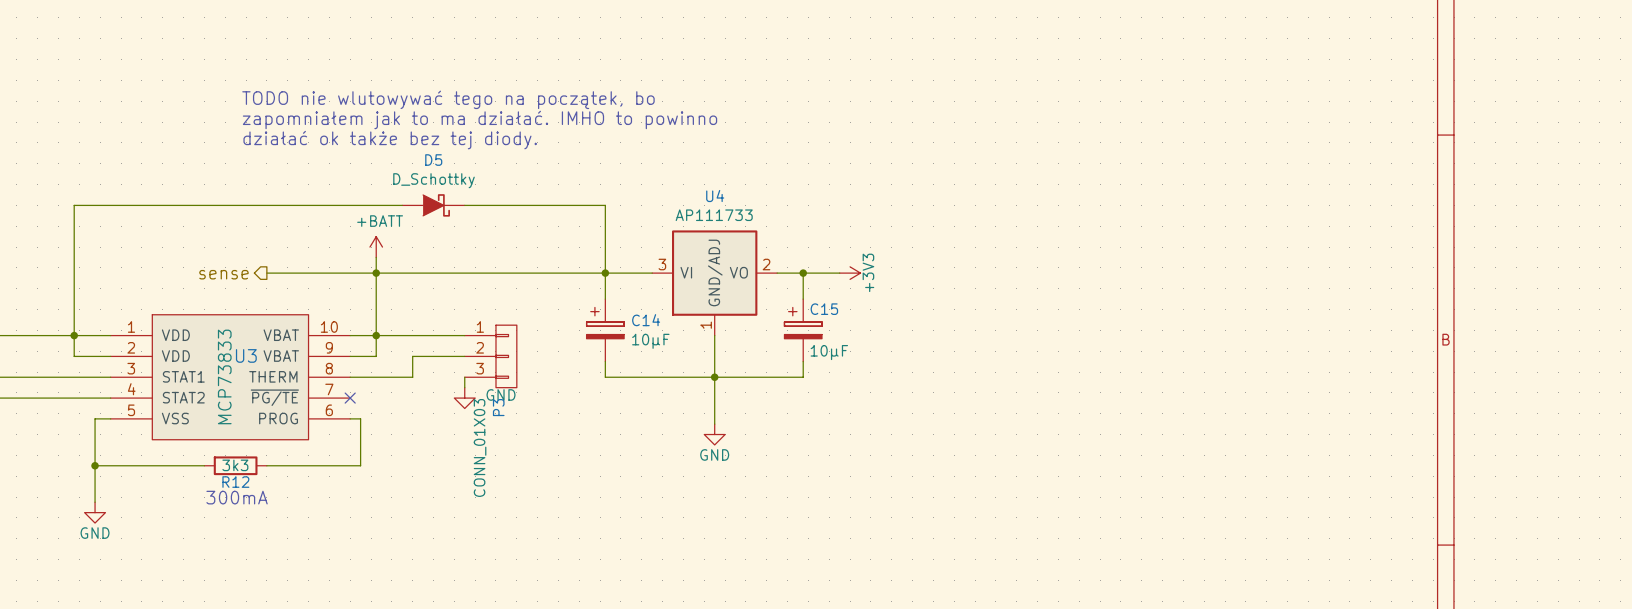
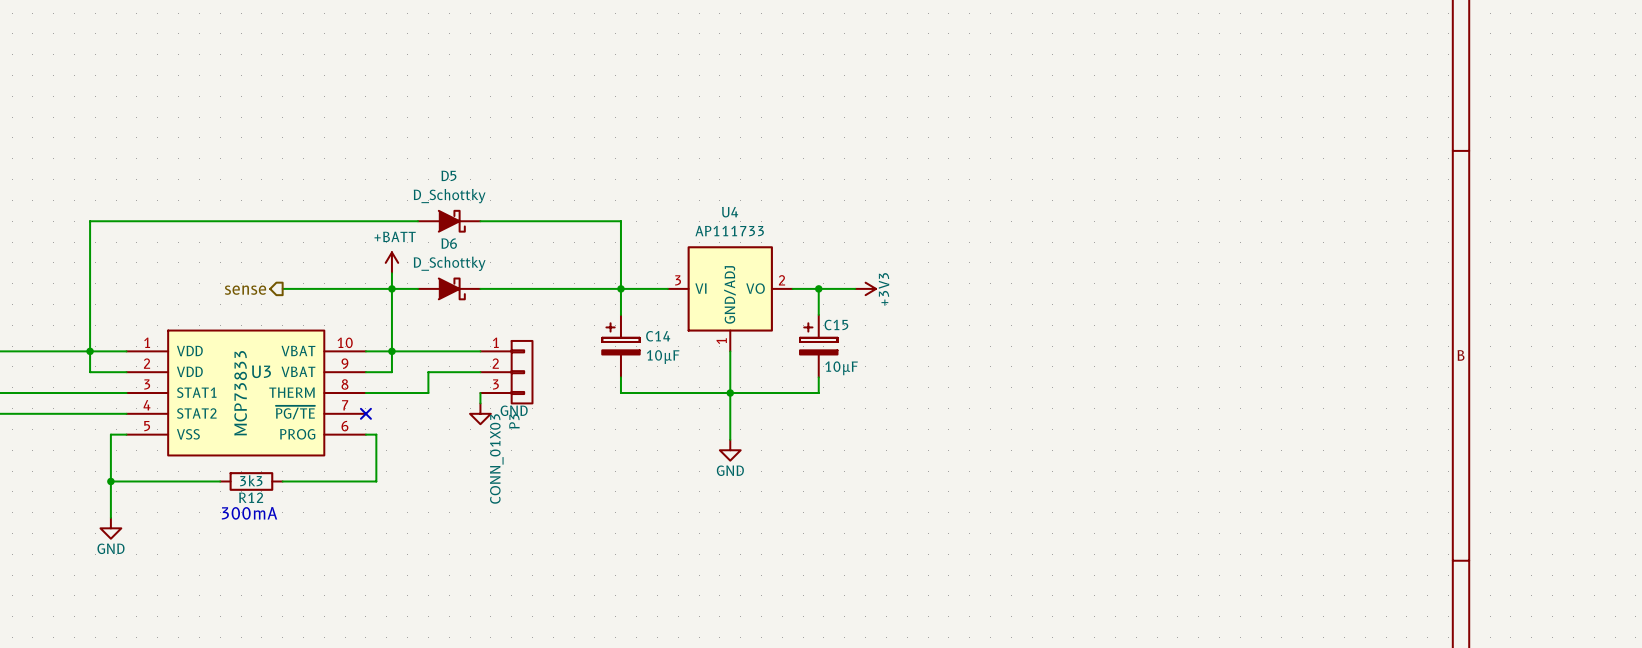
text: TODO nie wlutowywać tego na początek, bo (448, 99) -> none
text: zapomniałem jak to ma działać. IMHO to powinno (480, 119) -> none
text: działać ok także bez tej diody. (390, 140) -> none
D6: none -> D_Schottky (449, 288)

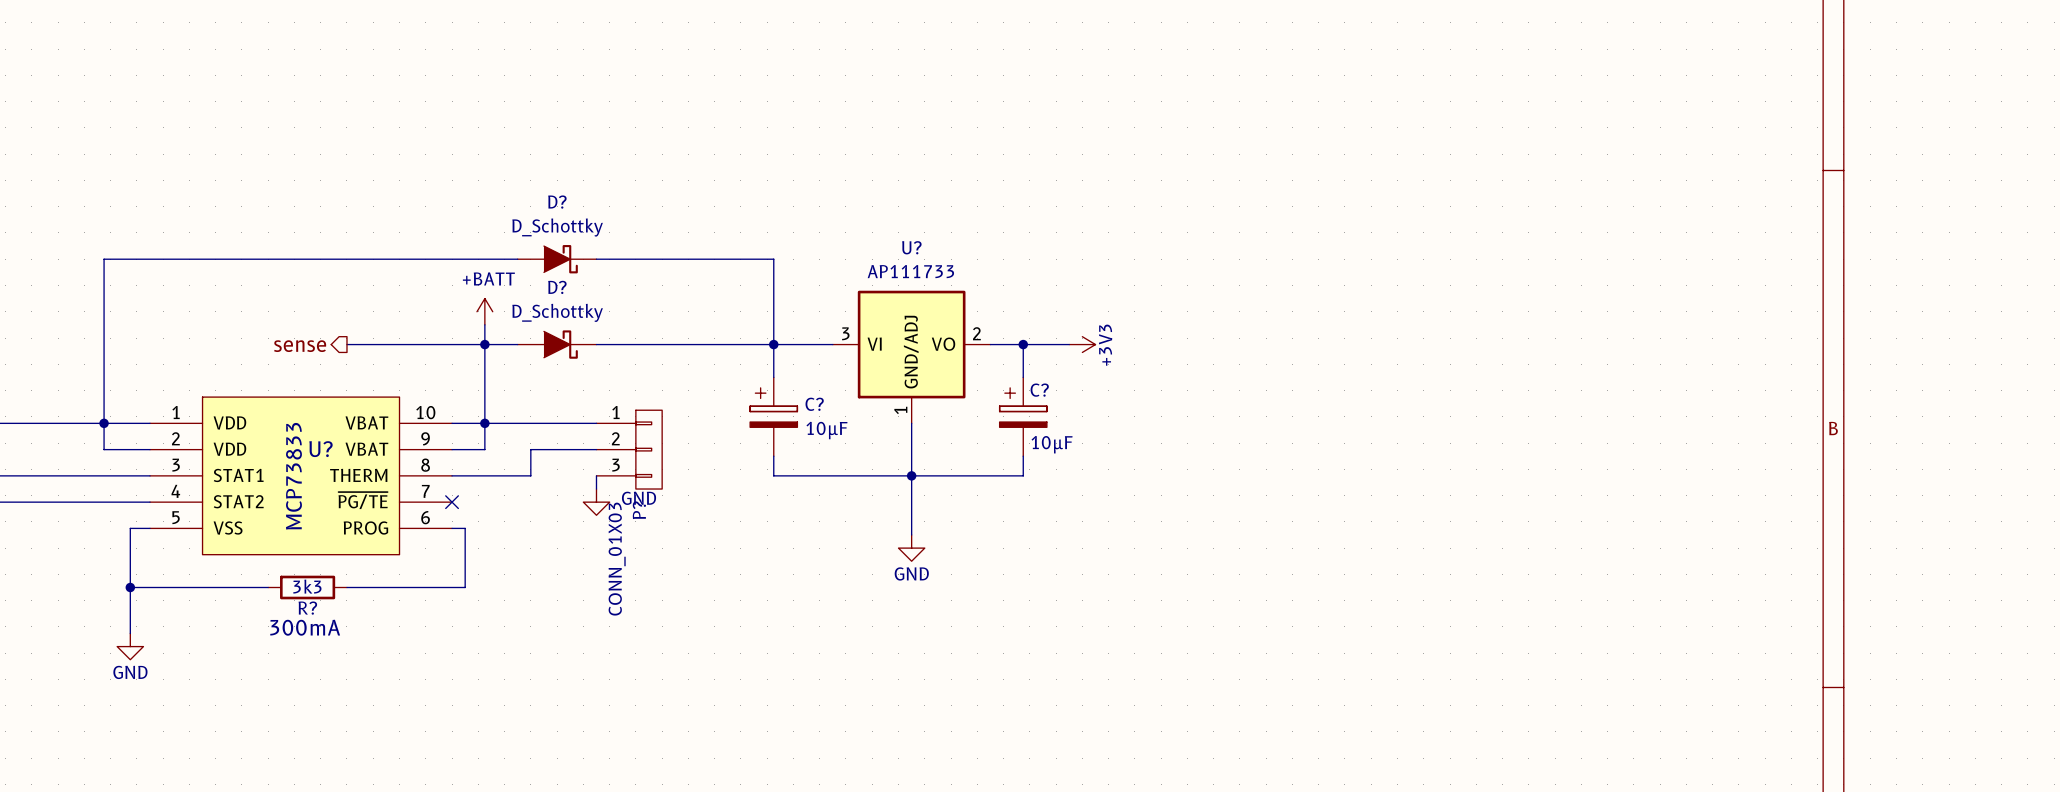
D5 name: D5 (448, 175) -> D? (557, 202)
U4 name: U4 (730, 212) -> U? (911, 247)
D6 name: D6 (449, 243) -> D? (557, 287)
C15 name: C15 (836, 325) -> C? (1039, 390)
C14 name: C14 (658, 336) -> C? (814, 404)
U3 name: U3 (261, 371) -> U? (320, 449)
P3 name: P3 (514, 421) -> P? (639, 510)
R12 name: R12 (251, 497) -> R? (307, 608)

